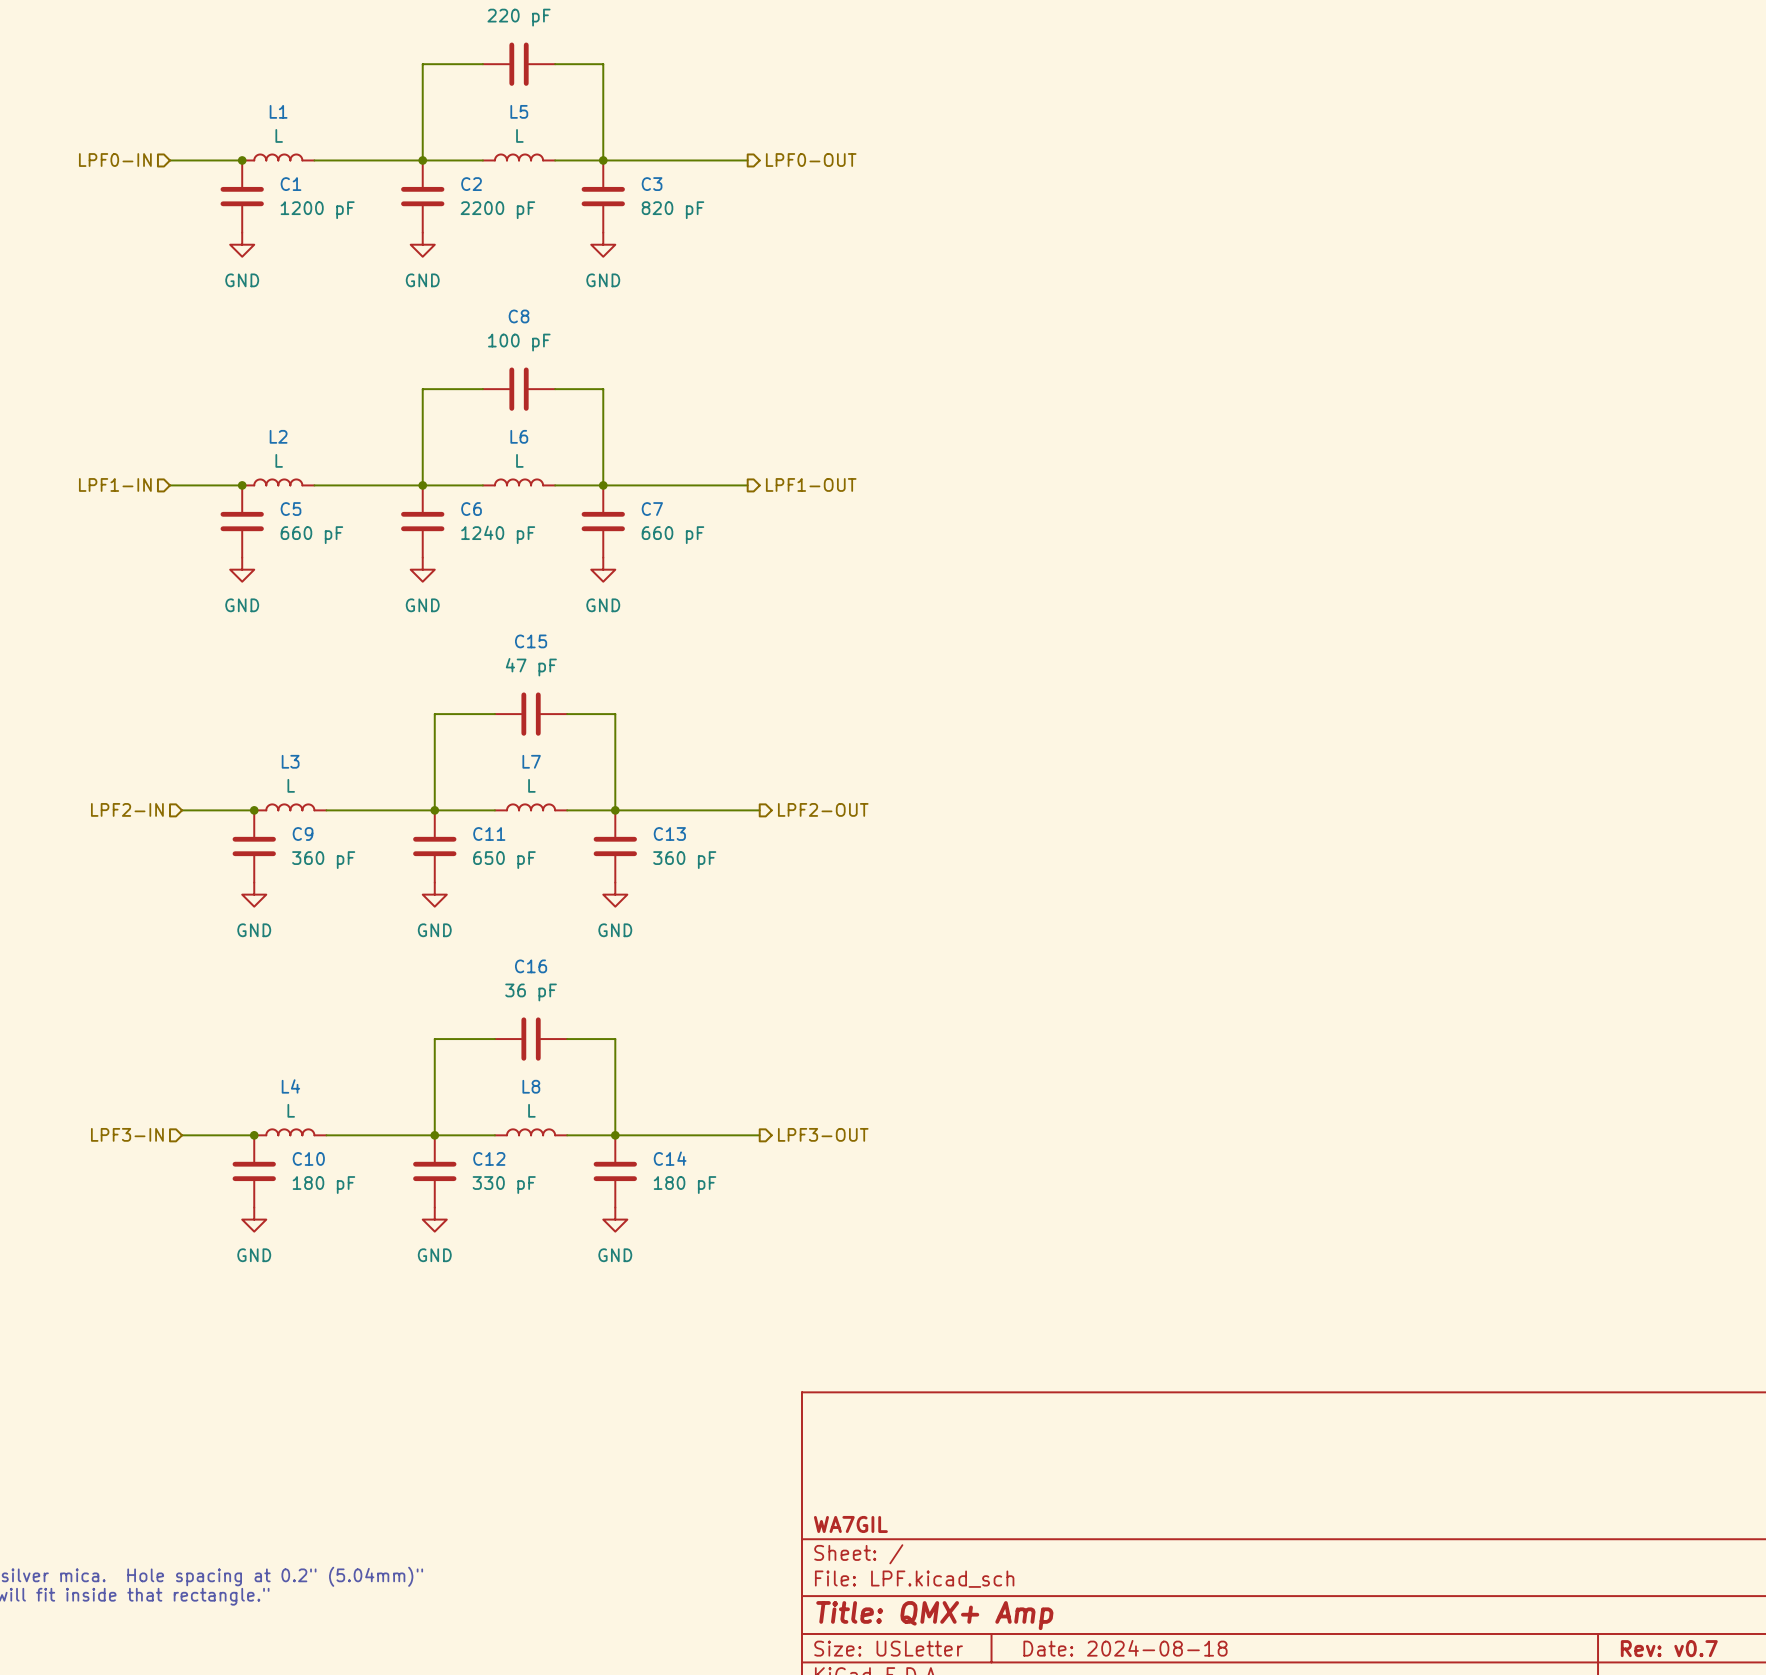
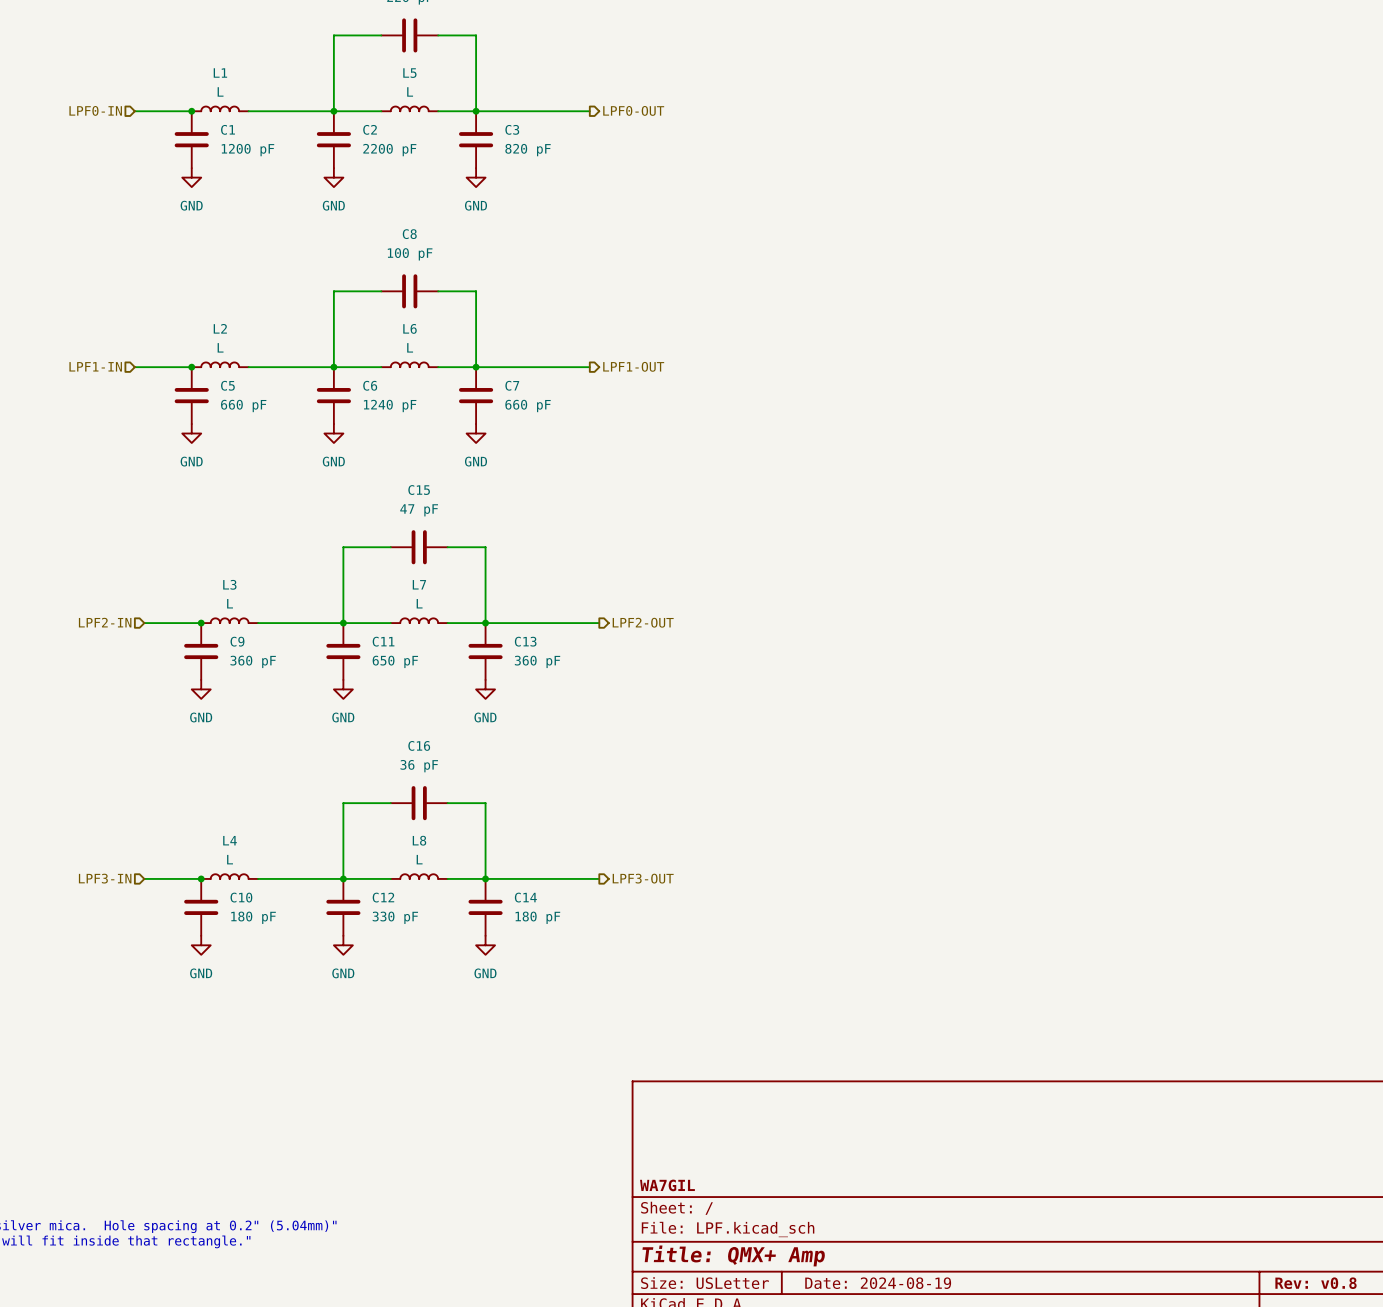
title block: Date: 2024-08-18 (1125, 1648) -> Date: 2024-08-19 (878, 1283)
title block: Rev: v0.7 (1669, 1648) -> Rev: v0.8 (1316, 1283)

